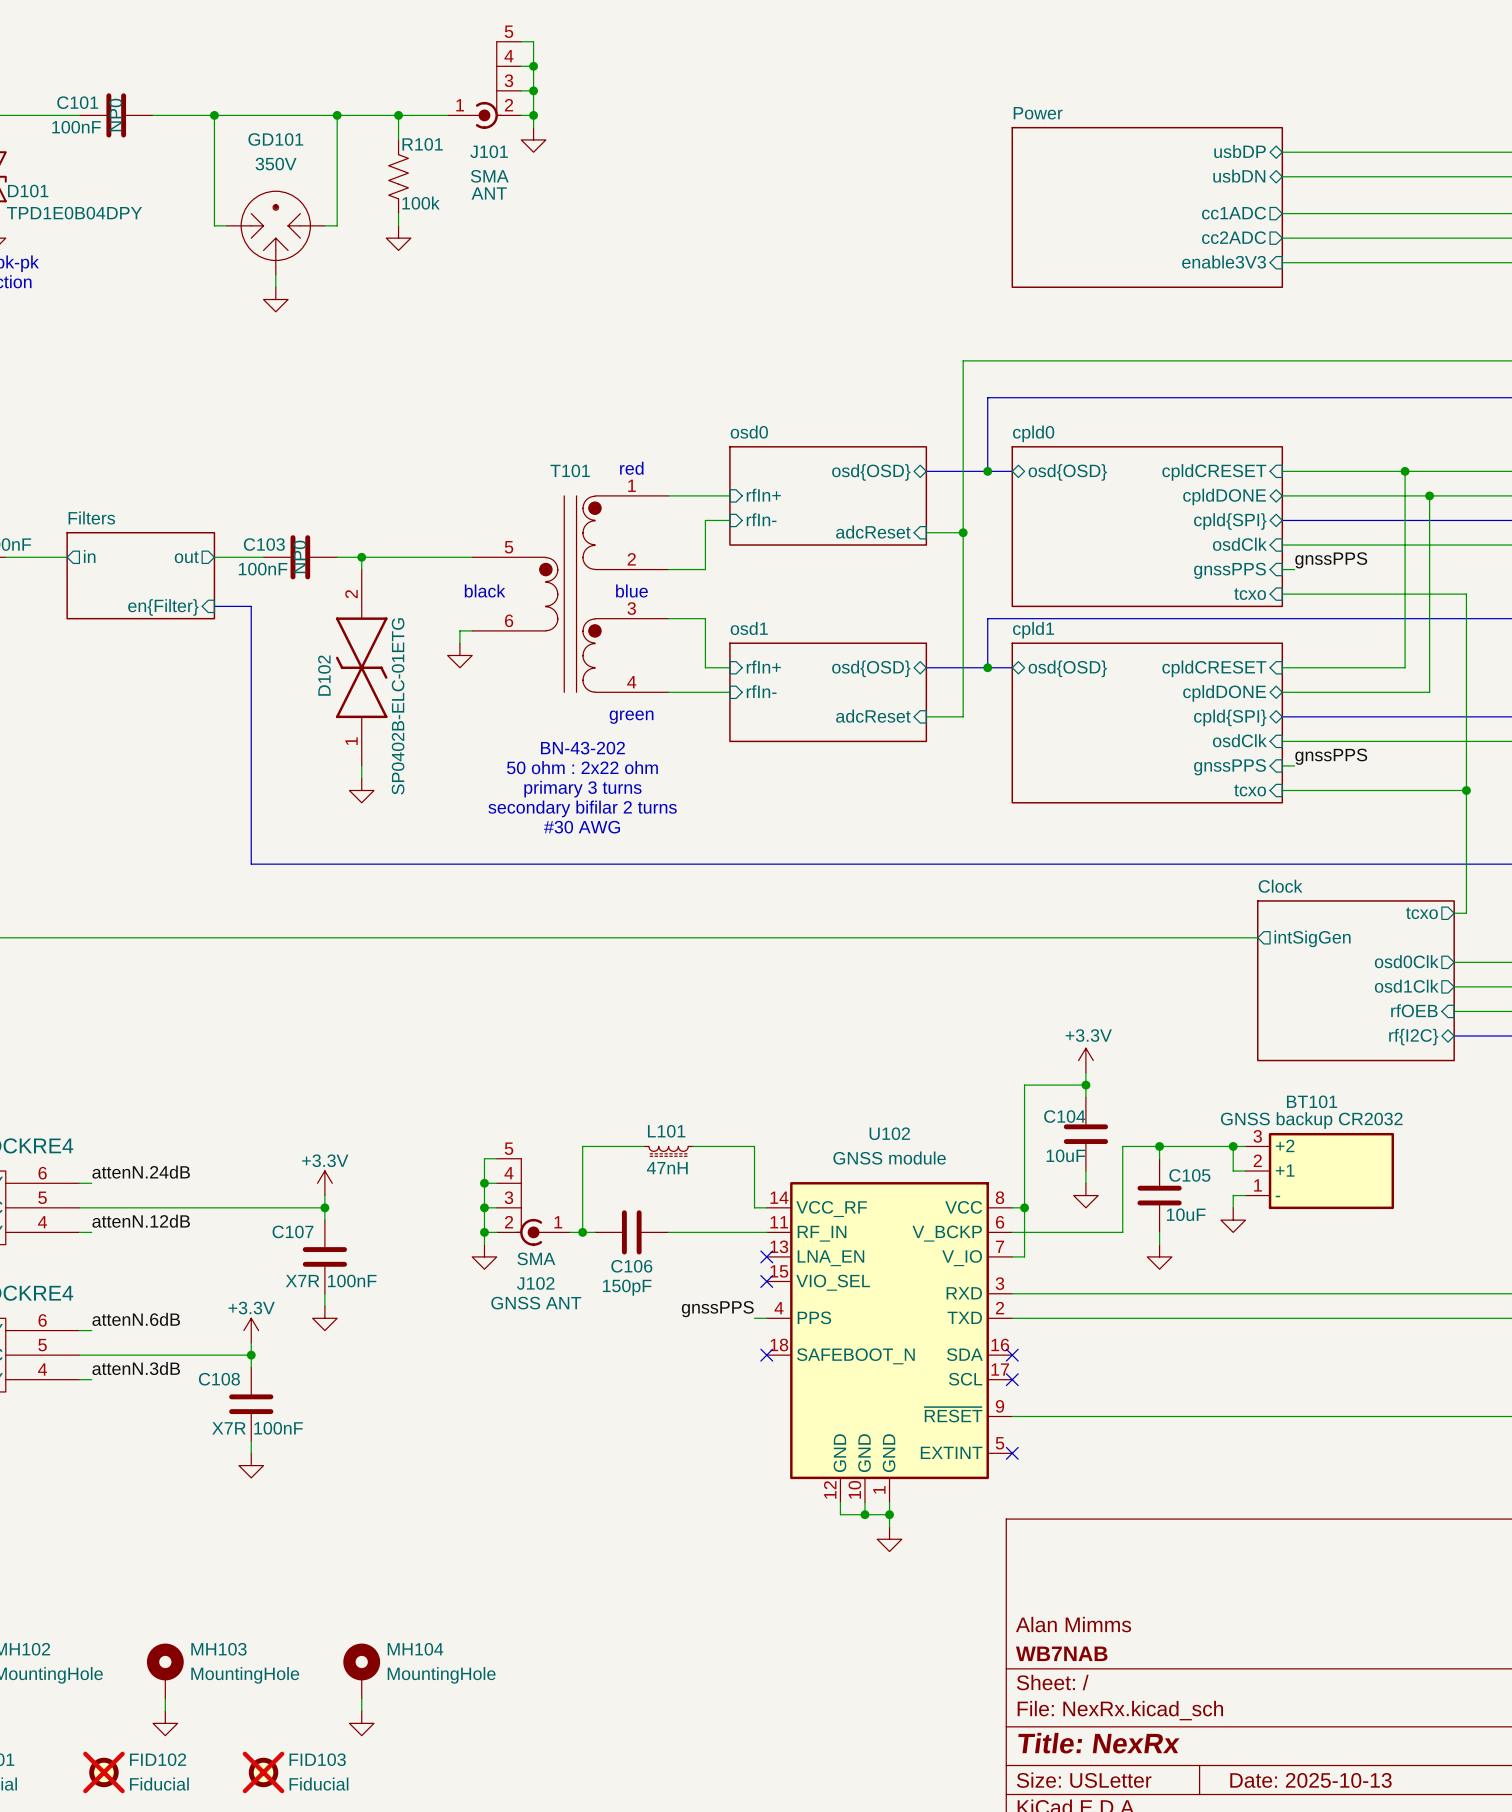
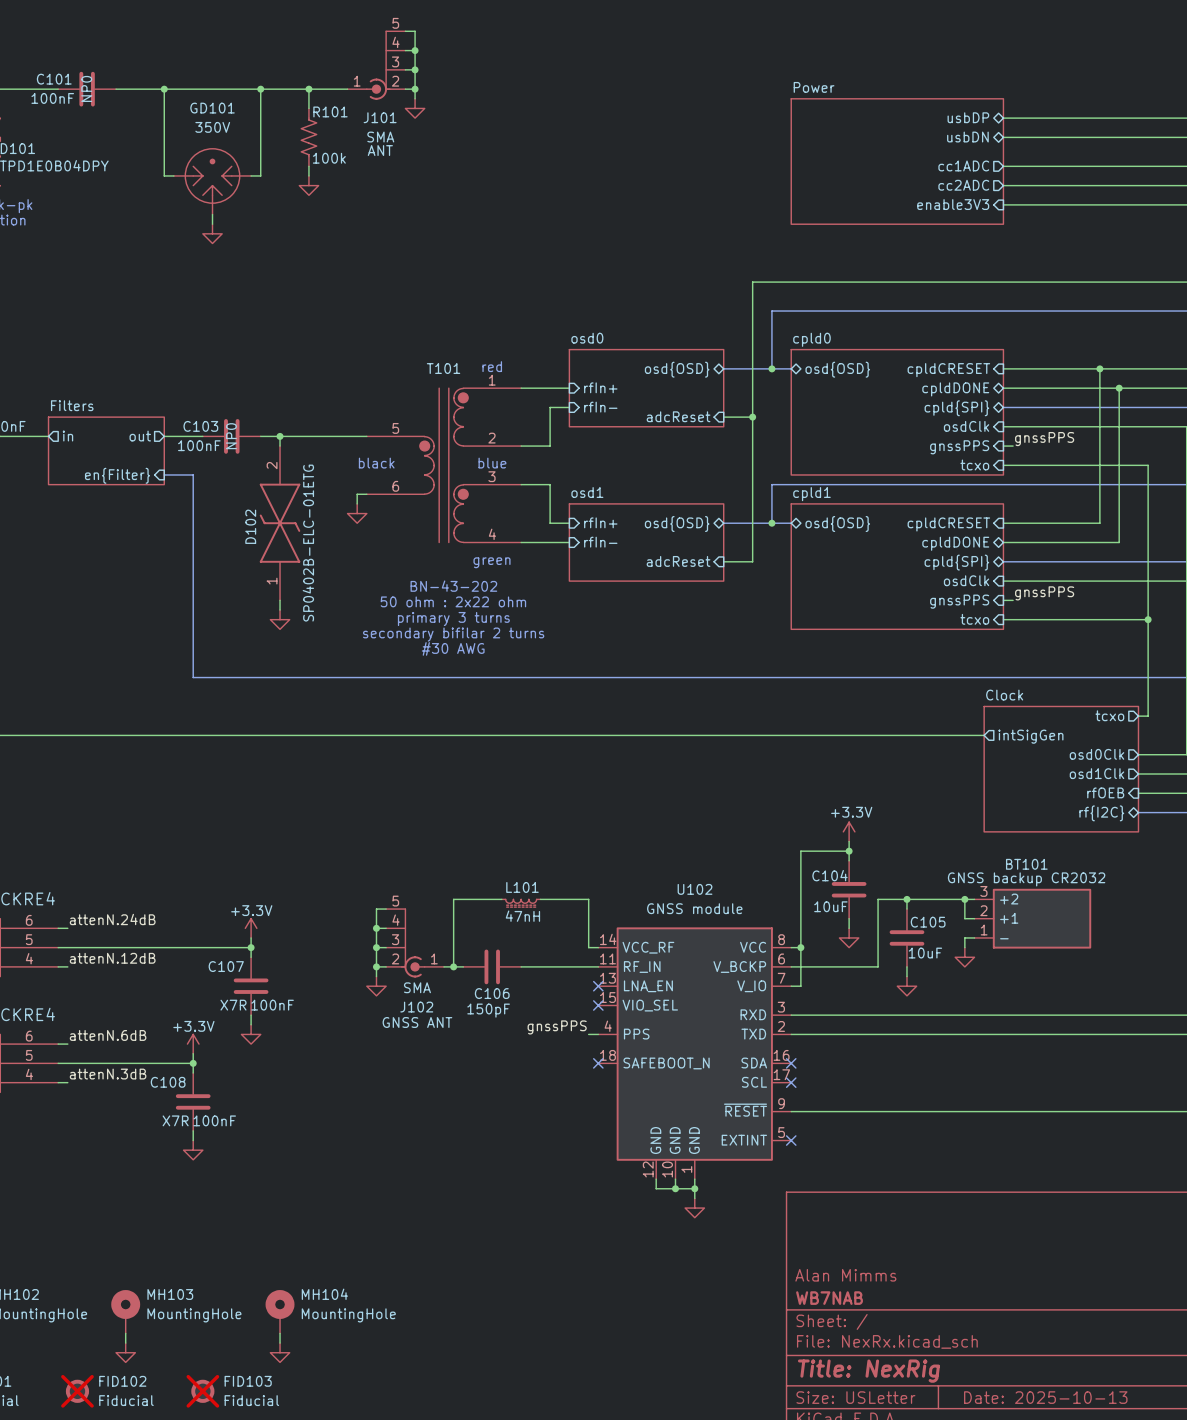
title block: Title: NexRx (1098, 1743) -> Title: NexRig (868, 1371)

